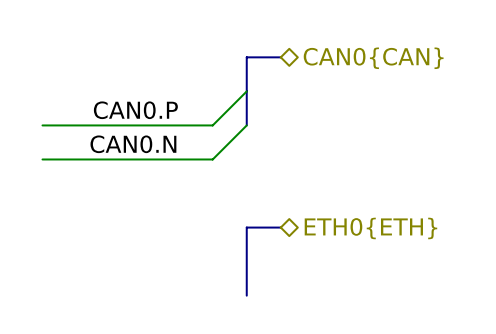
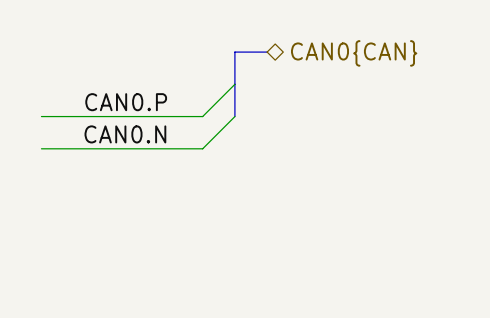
bus: (280, 227) (246, 227) (246, 295) -> none
hierarchical label: ETH0{ETH} (370, 228) -> none

